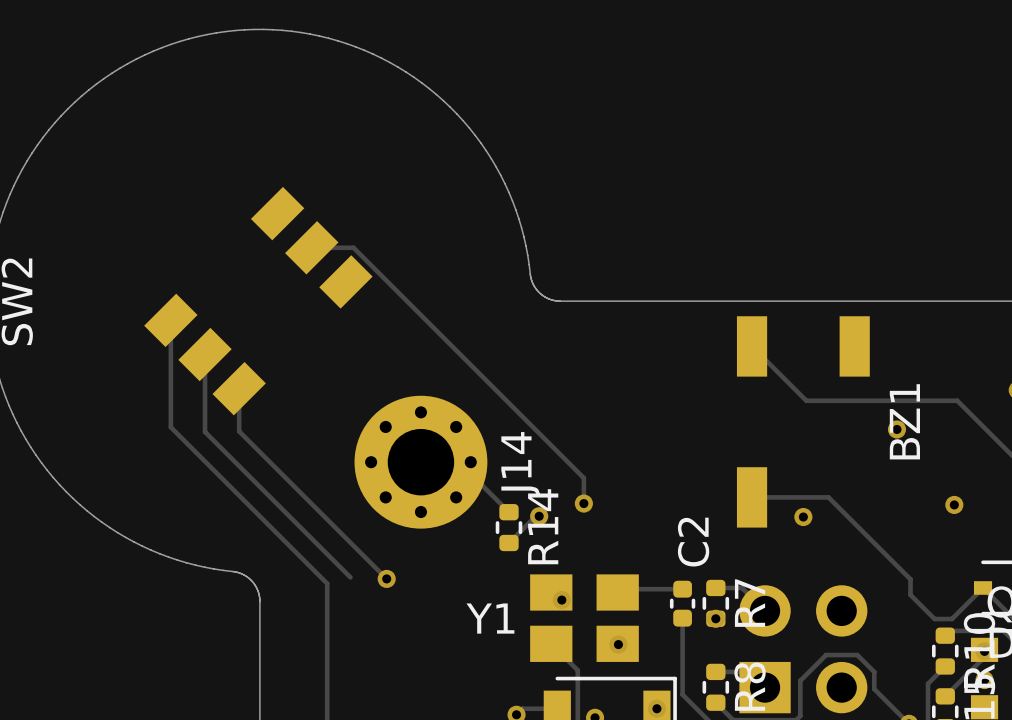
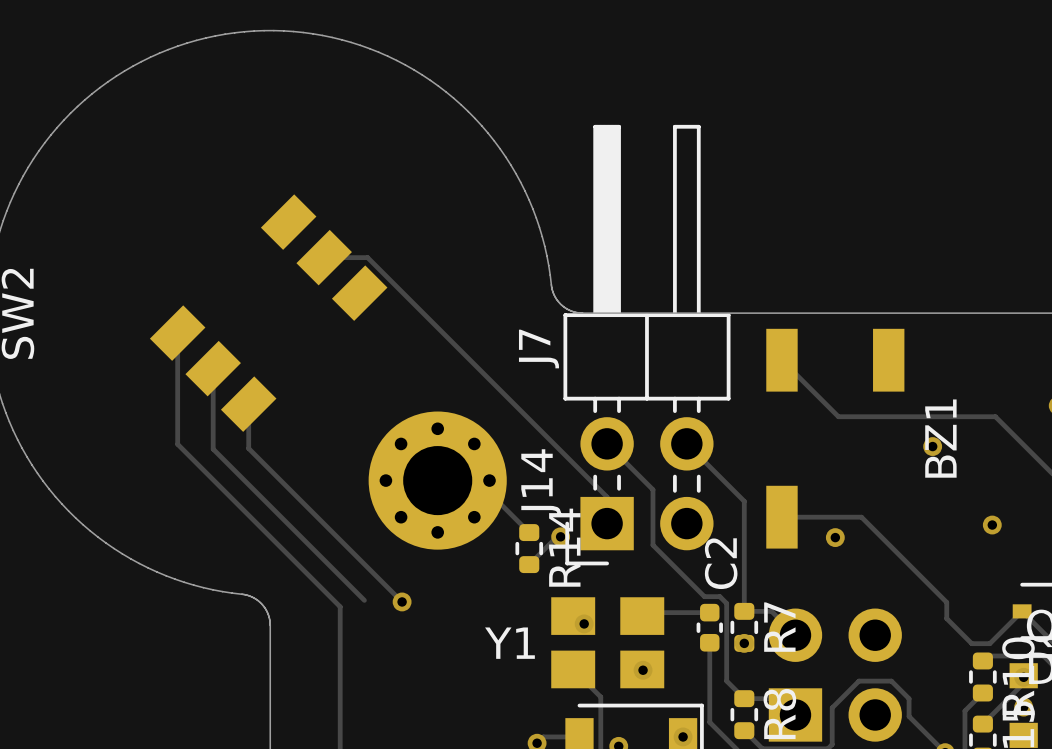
J7: none -> (646, 345)
track: none -> (607, 443) (652, 489) (652, 545) (704, 596) (719, 596) (726, 603) (726, 681) (747, 701)
track: none -> (686, 443) (744, 501) (744, 611)
via: (583, 503) -> none

